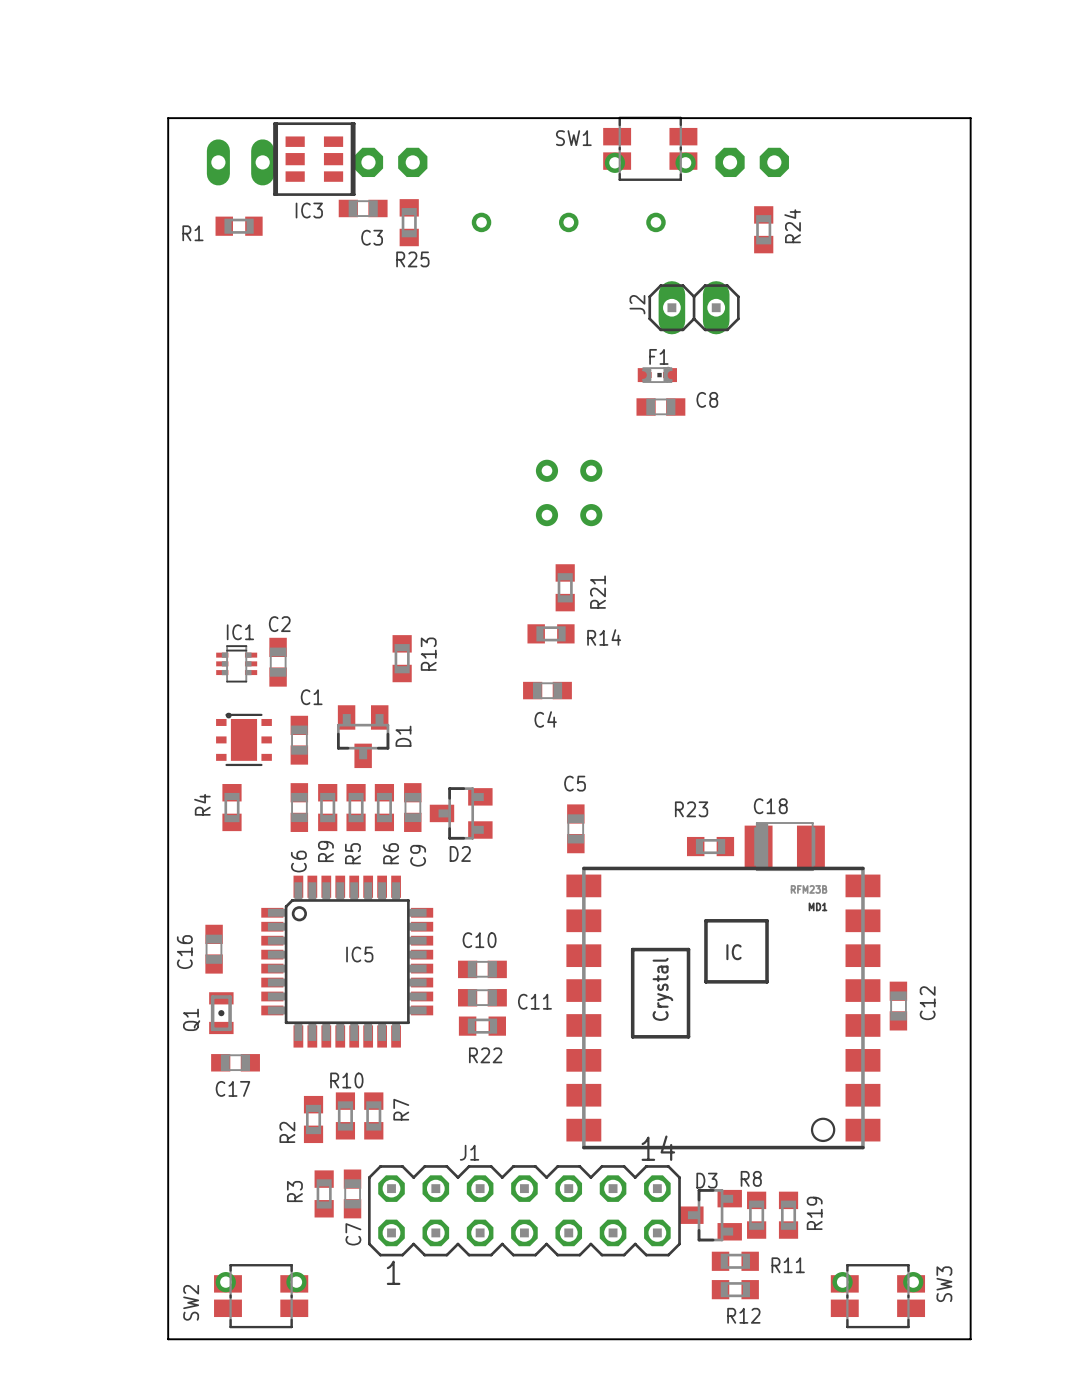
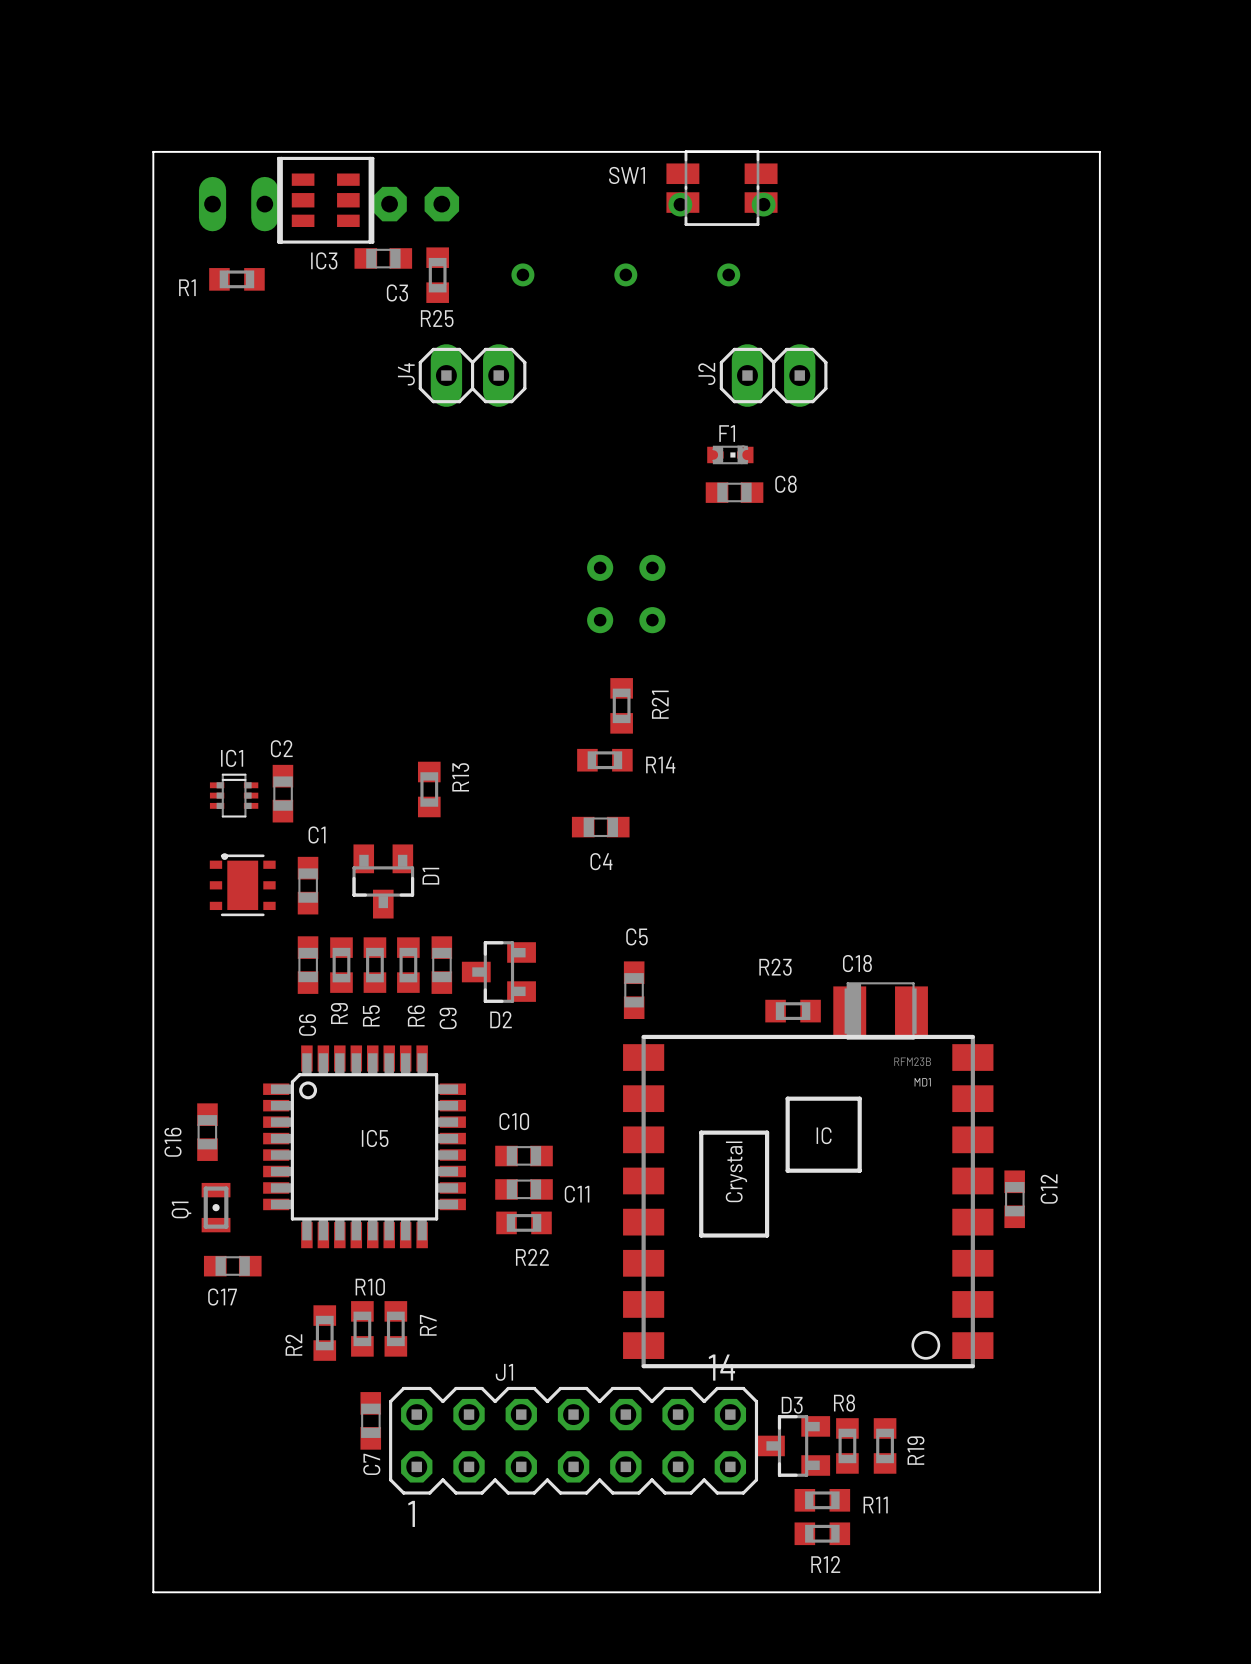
part: (752, 162) -> none
R24: (763, 229) -> none
J4: none -> (472, 375)
R4: (231, 807) -> none
R3: (324, 1193) -> none
SW2: (261, 1296) -> none
SW3: (877, 1296) -> none

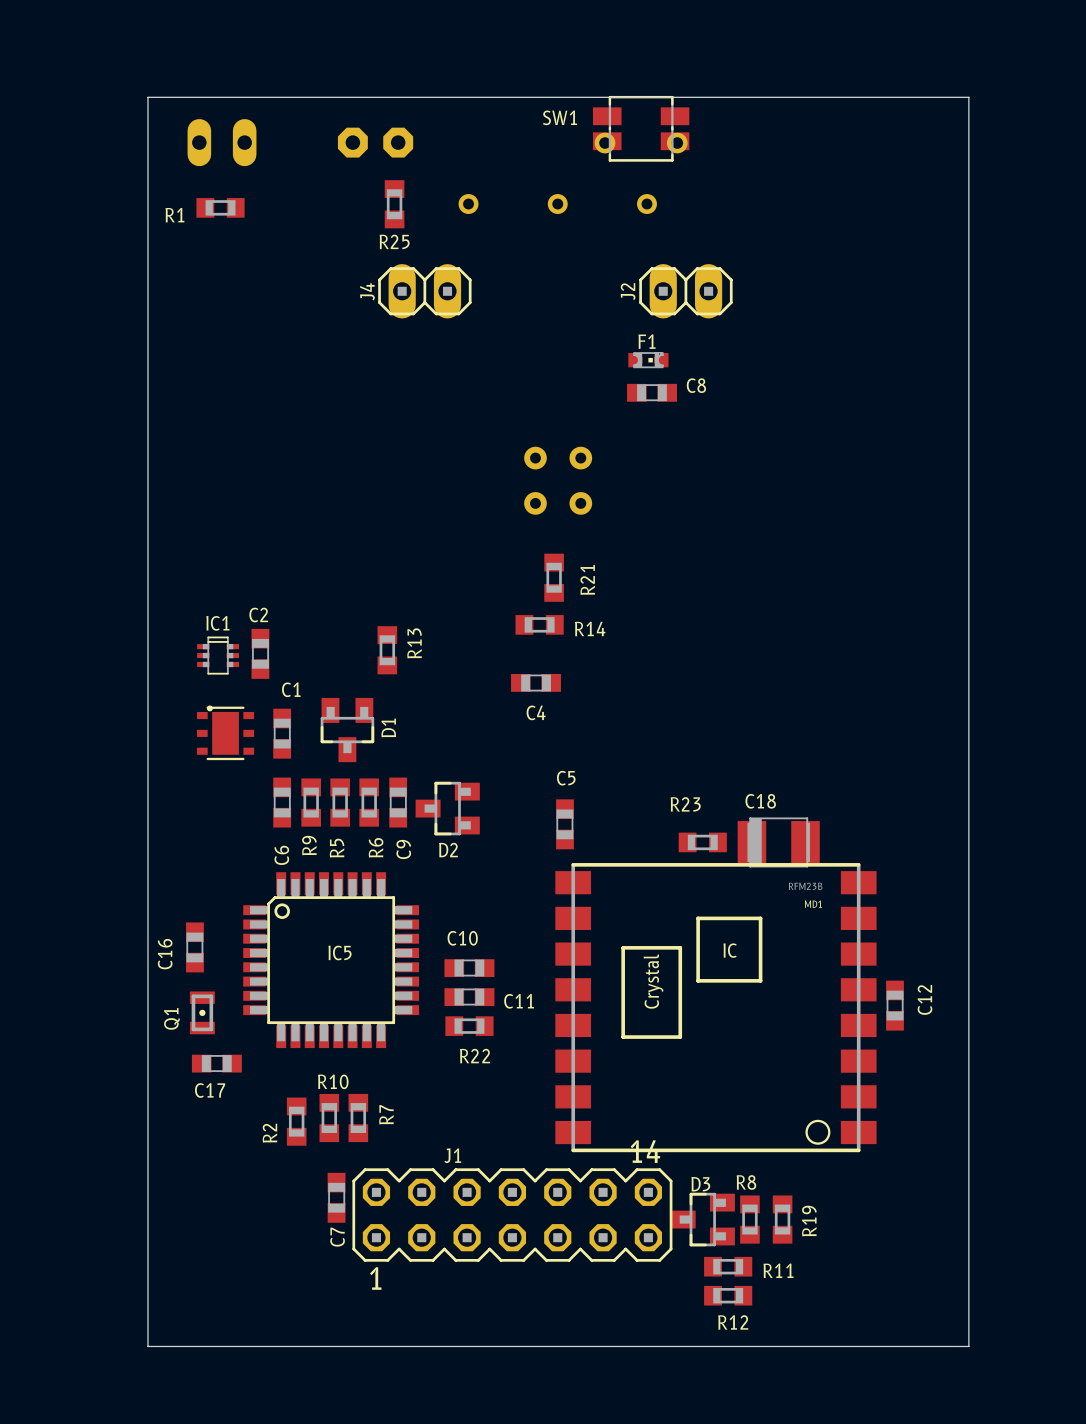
IC3: (325, 200) -> none
C3: (383, 258) -> none

